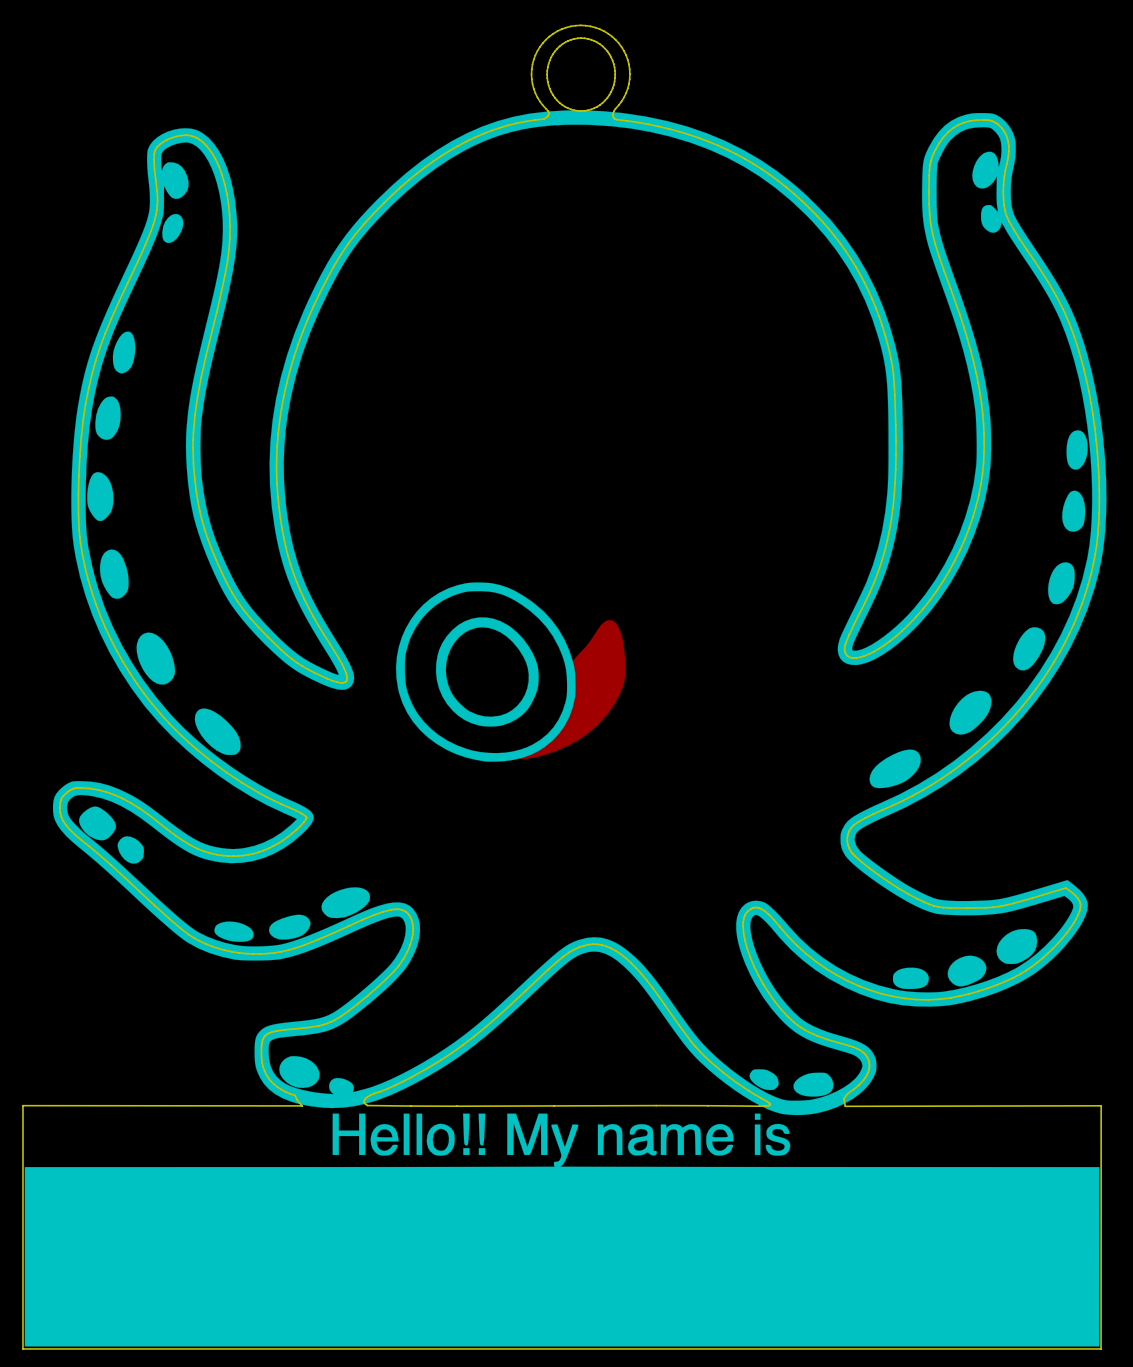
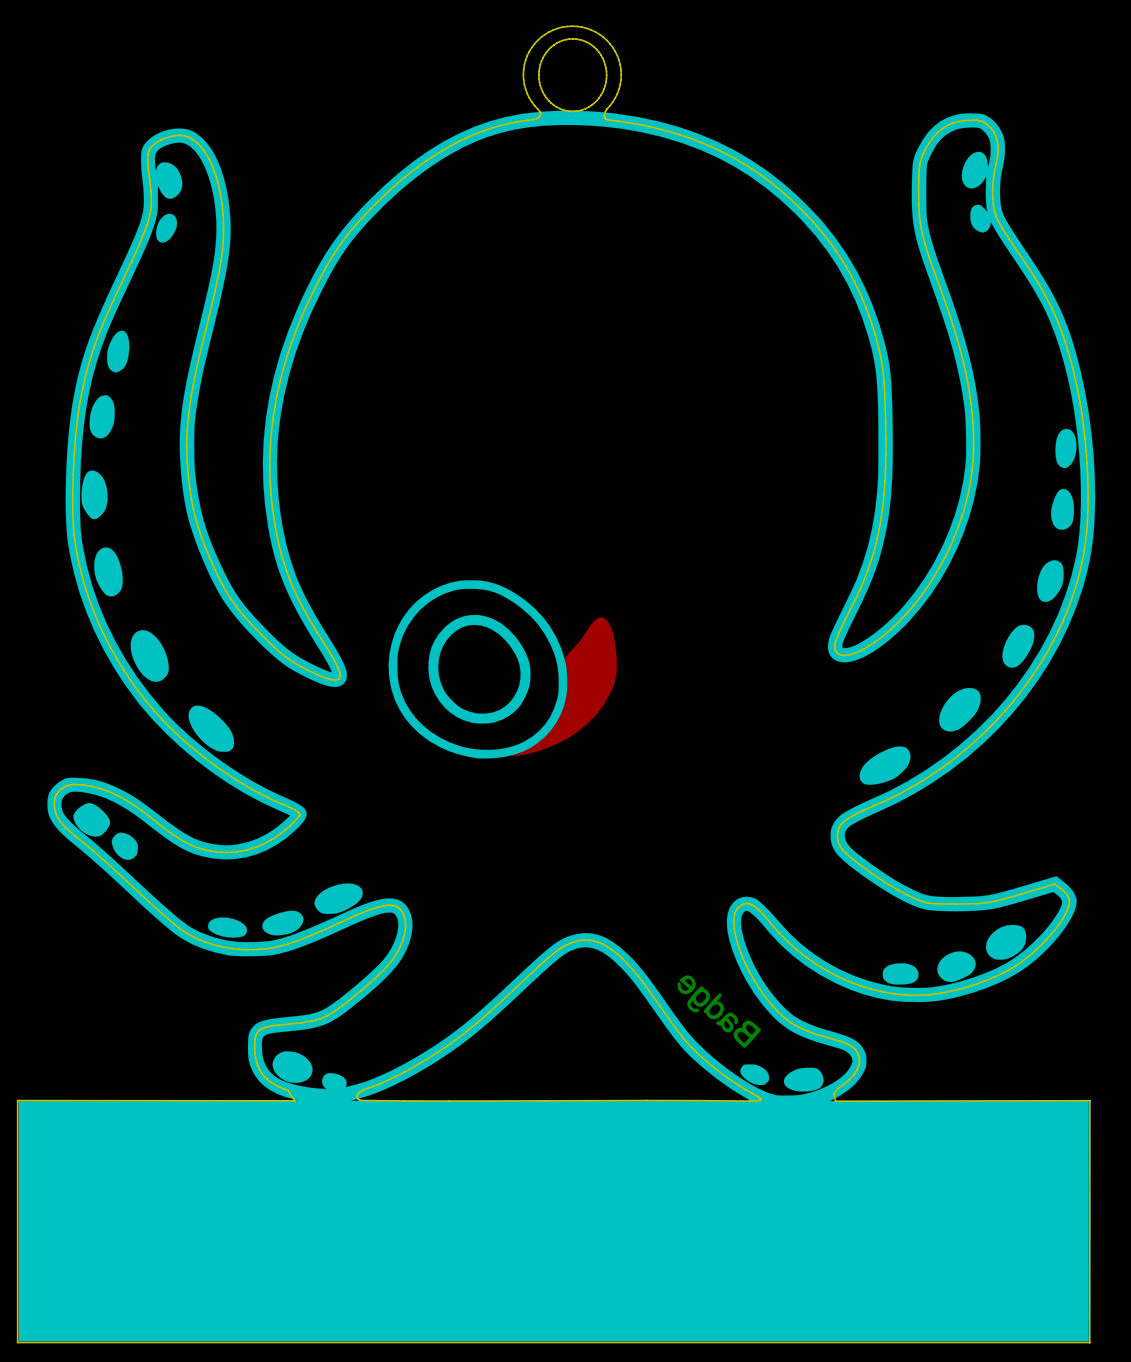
drawing shape: [24, 110, 1107, 1347] -> [18, 110, 1096, 1342]
drawing: none -> [677, 975, 762, 1049]

